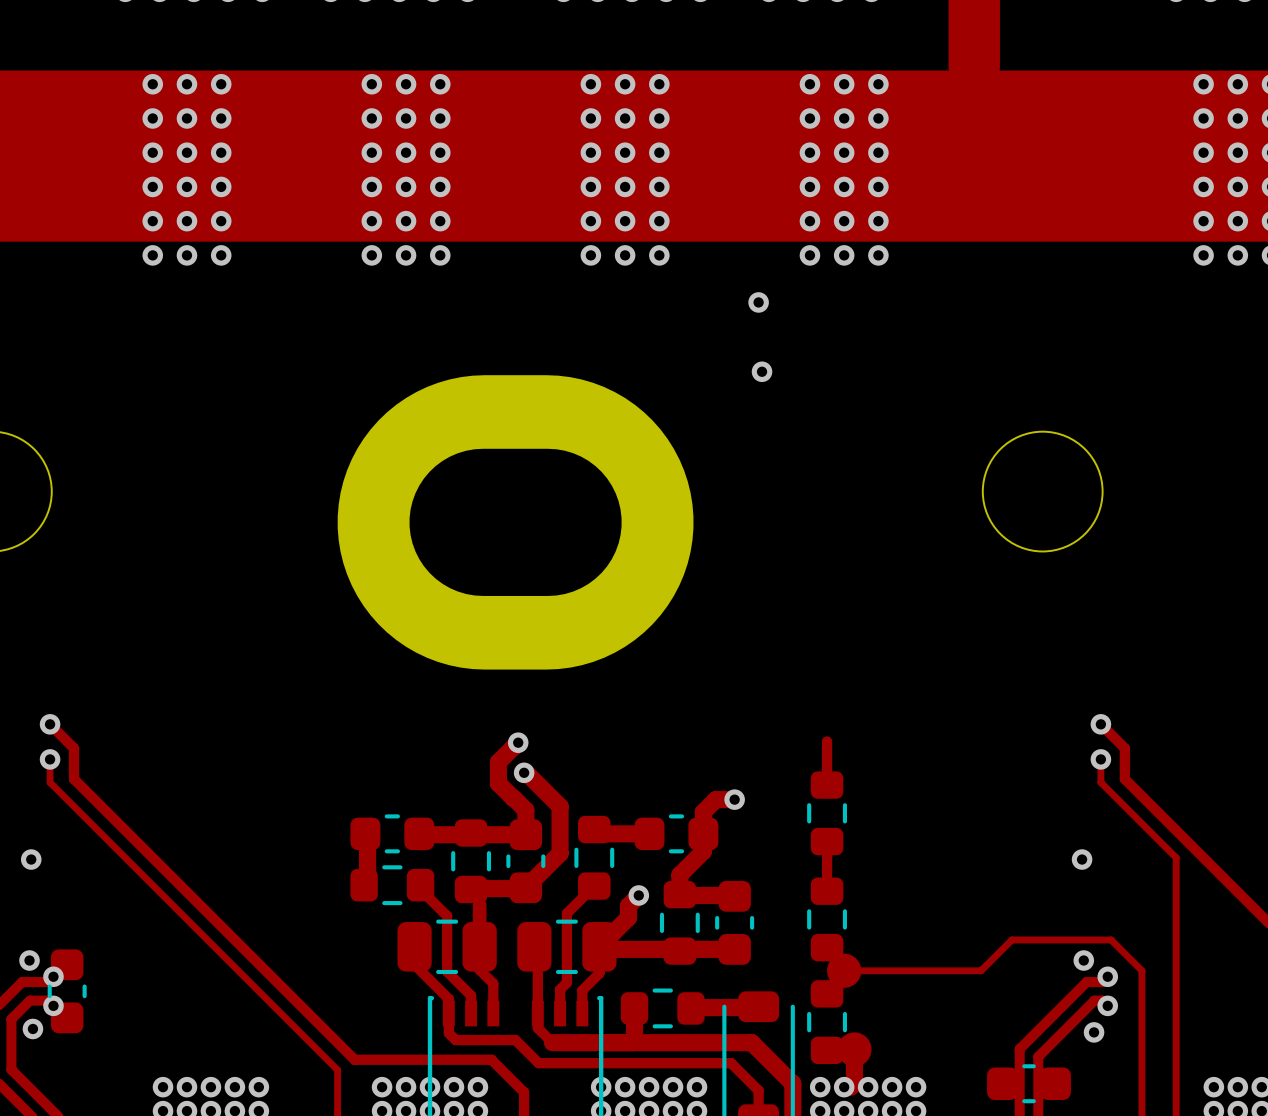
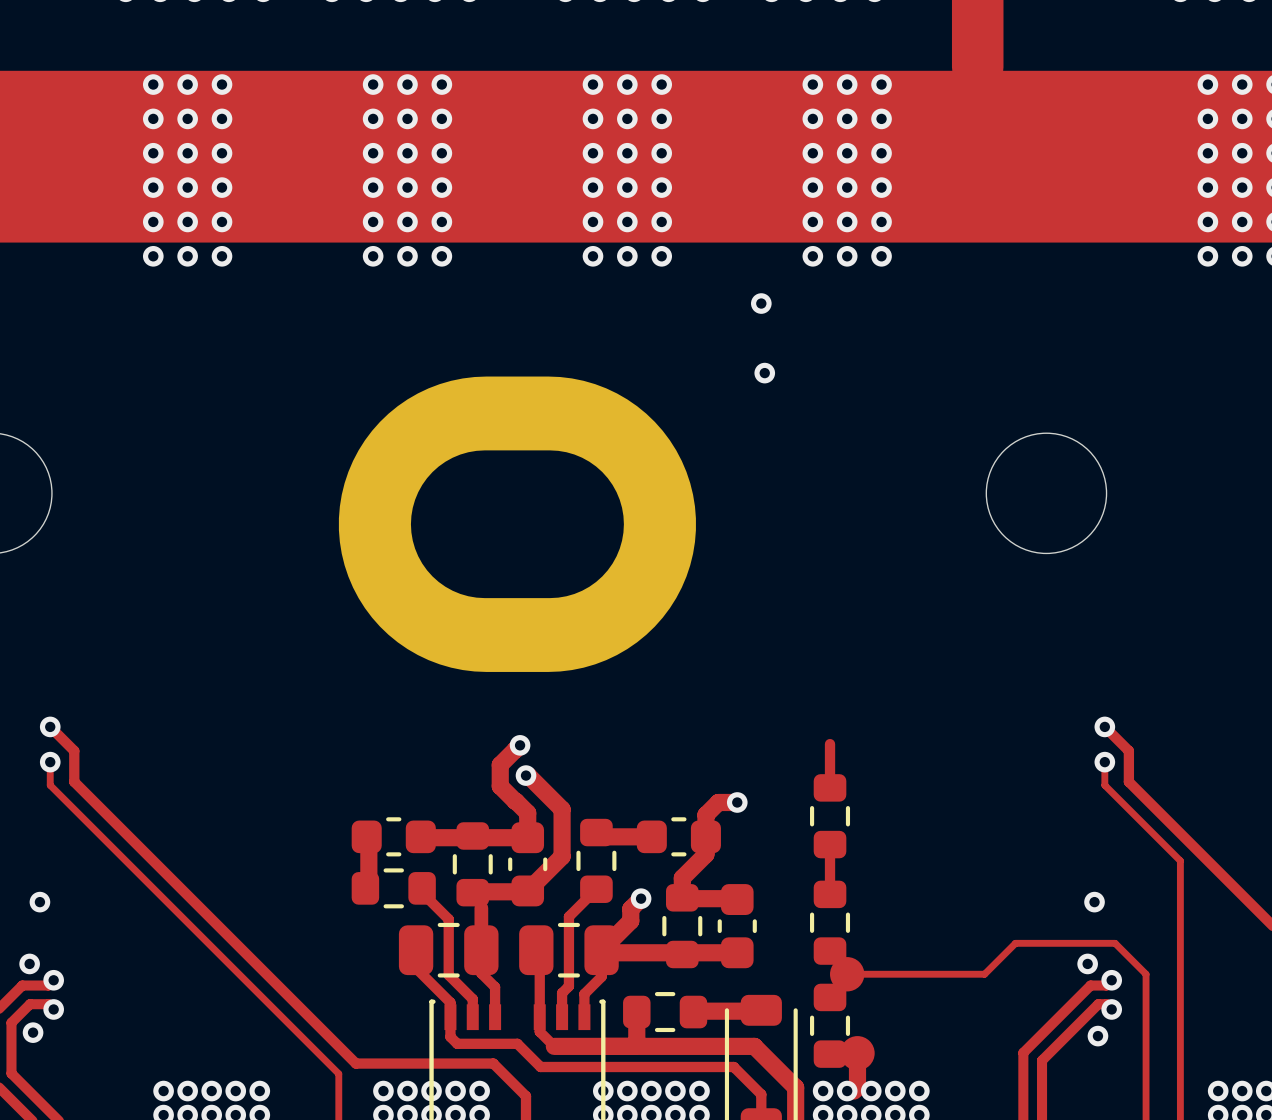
via position: (31, 859) -> (39, 902)
via position: (1082, 859) -> (1094, 902)
part: (67, 991) -> none
part: (1029, 1083) -> none

